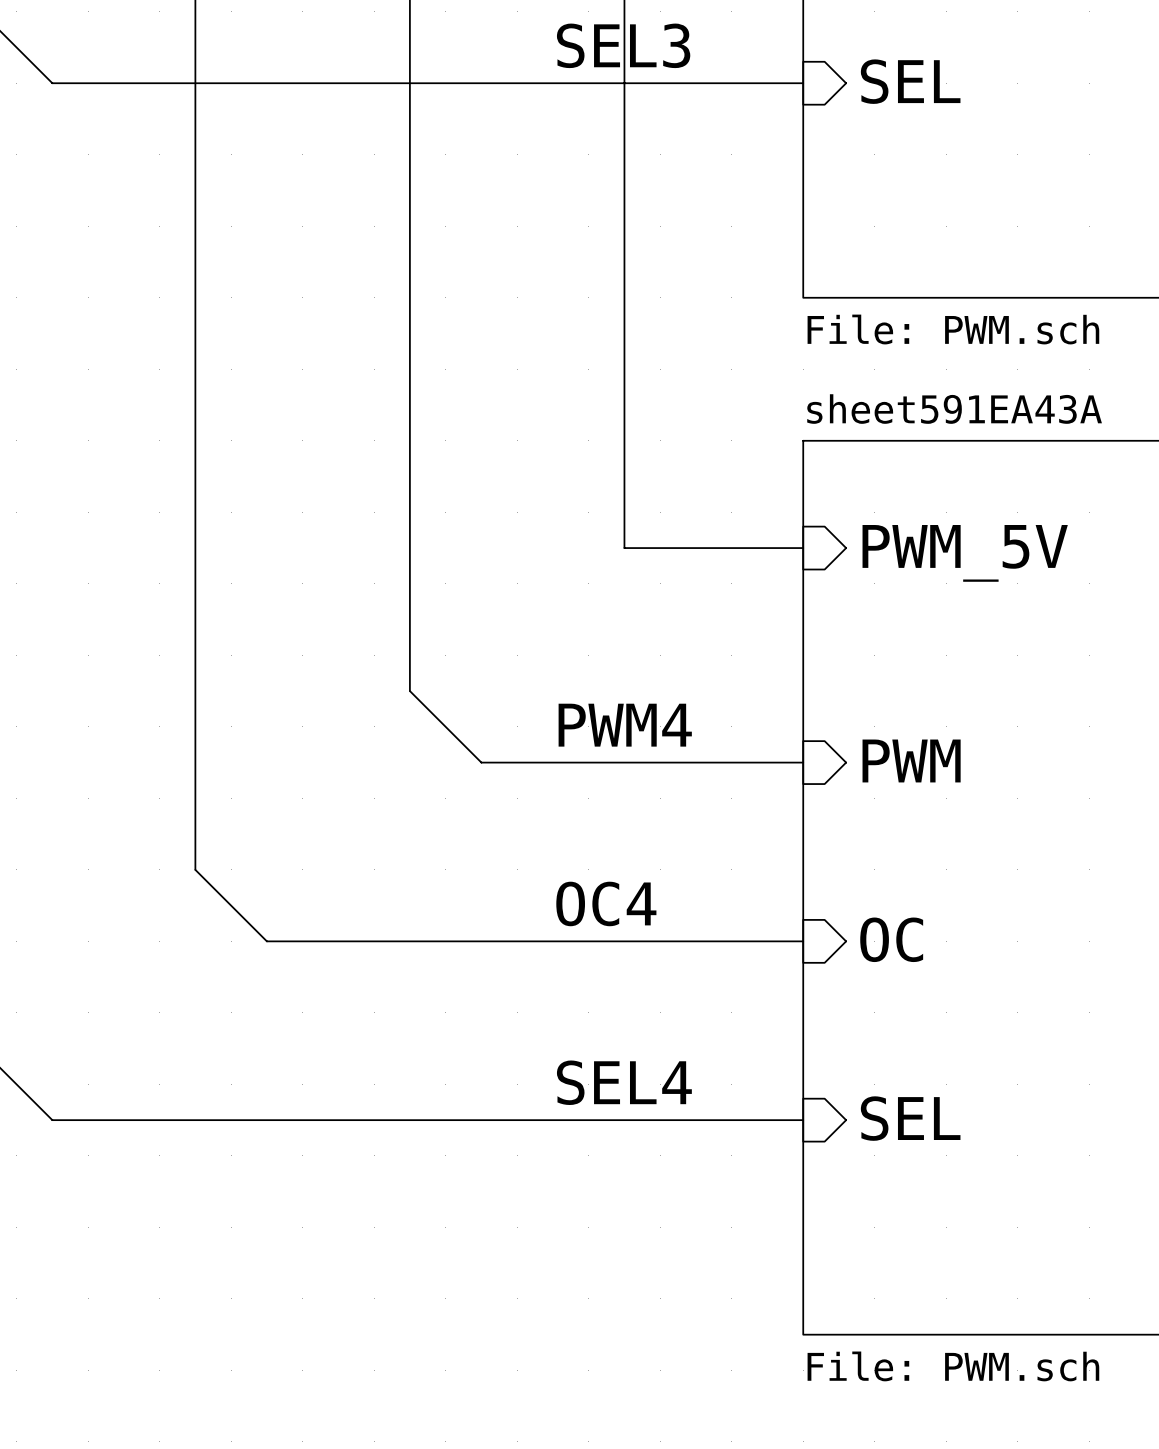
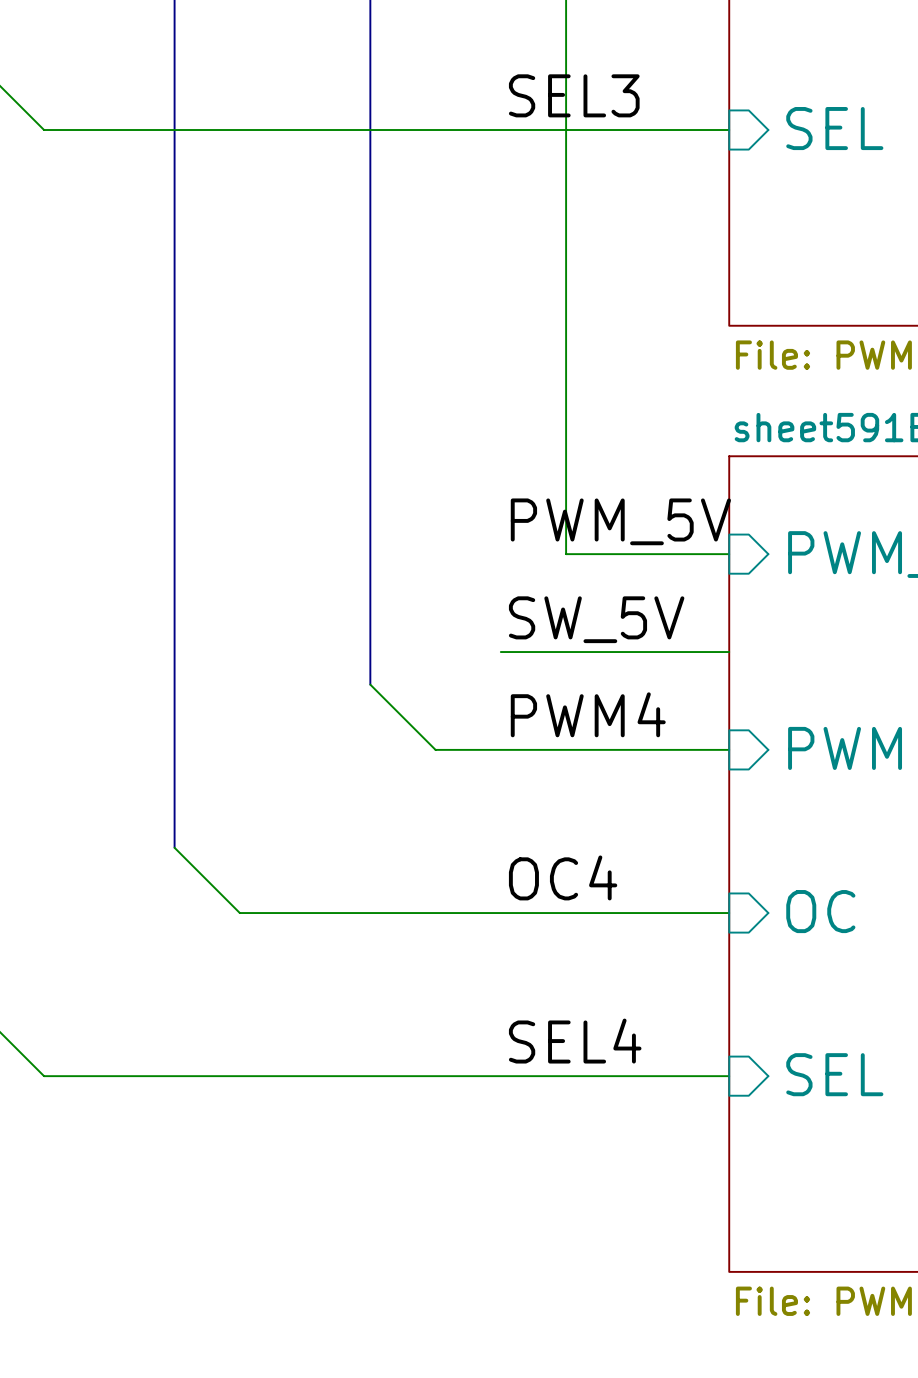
label: none -> PWM_5V (620, 521)
label: none -> SW_5V (596, 619)
wire: none -> (500, 652) (729, 652)

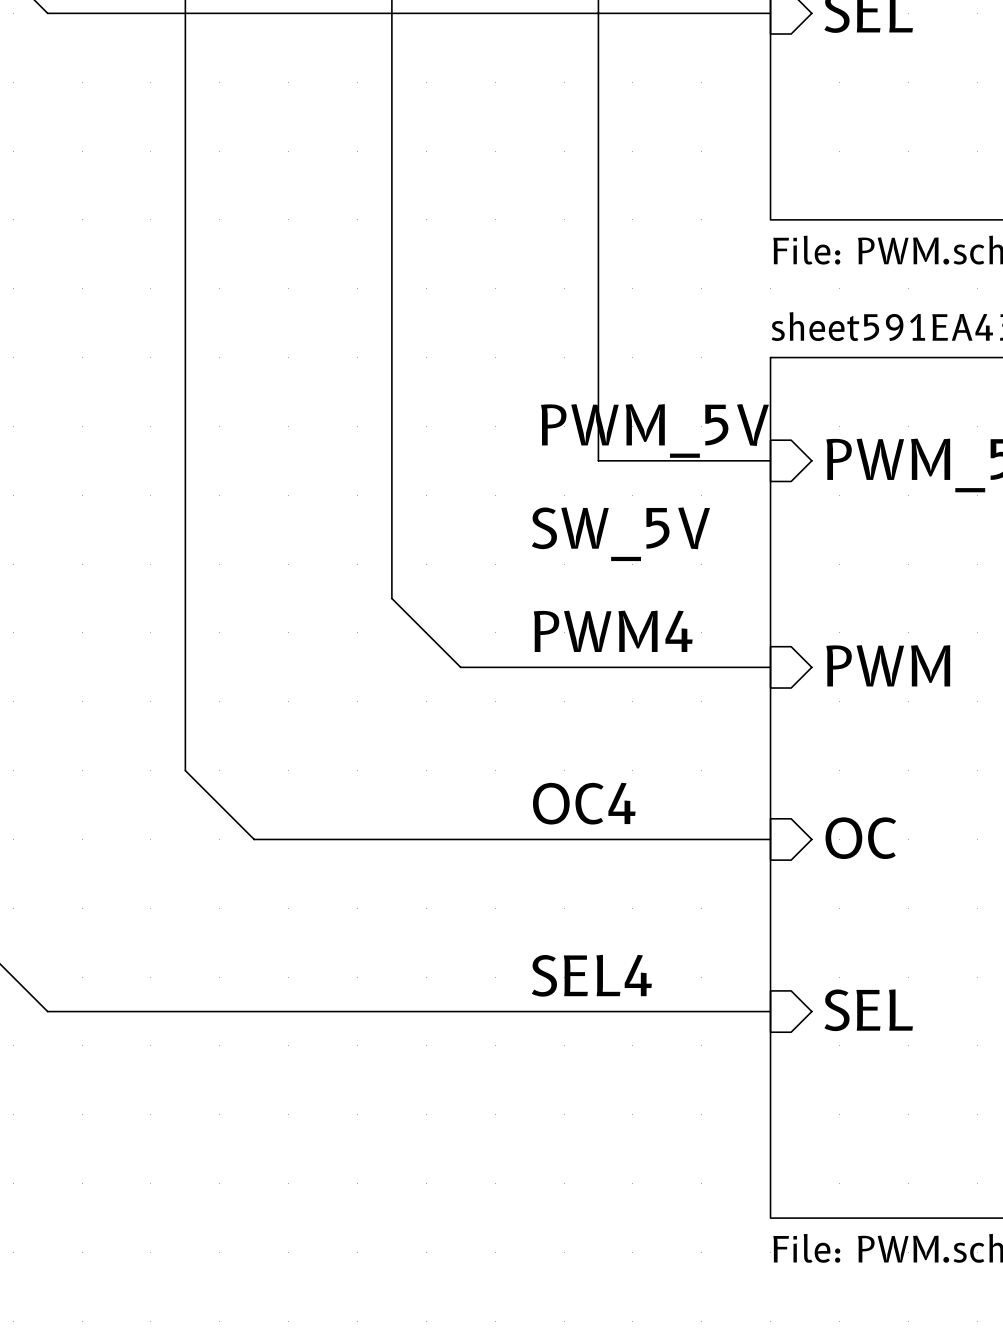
label position: PWM_5V (620, 521) -> PWM_5V (654, 430)
wire: (500, 652) (729, 652) -> none

